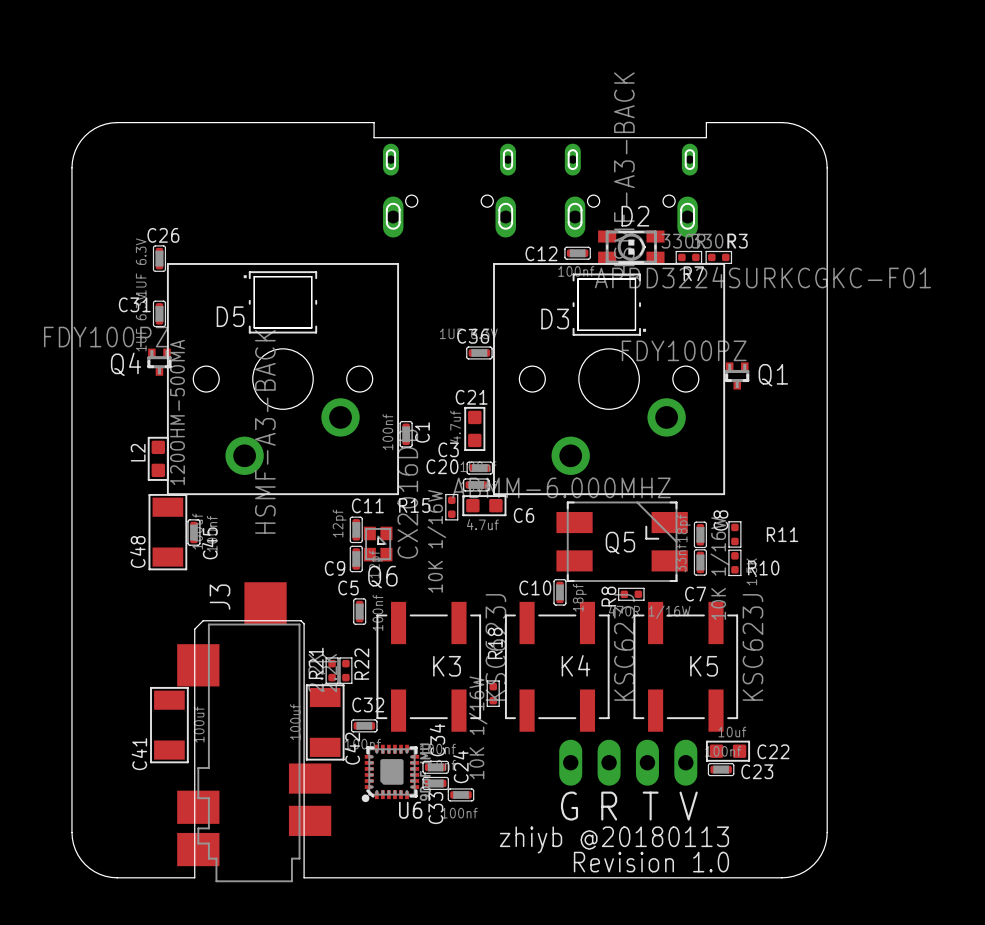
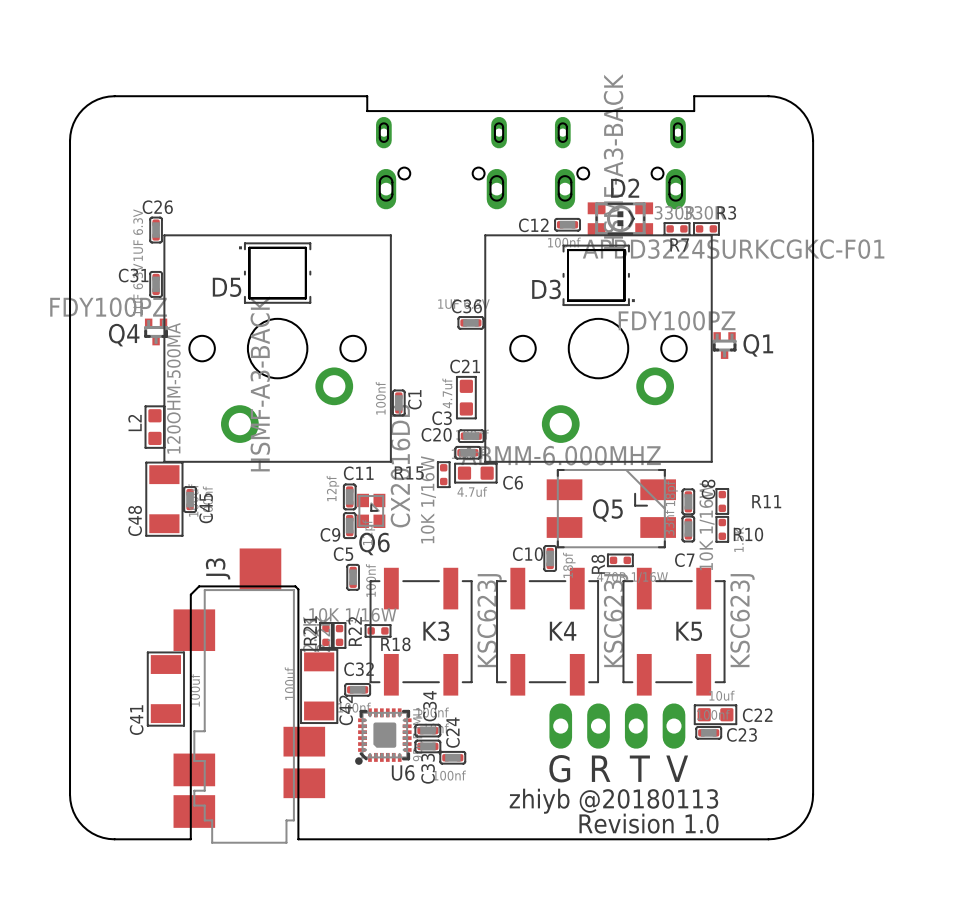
R18 name position: R18 (495, 643) -> R18 (395, 644)
R18 rotation: 0° (493, 693) -> 90° clockwise (378, 630)
R18 position: (493, 693) -> (378, 630)

